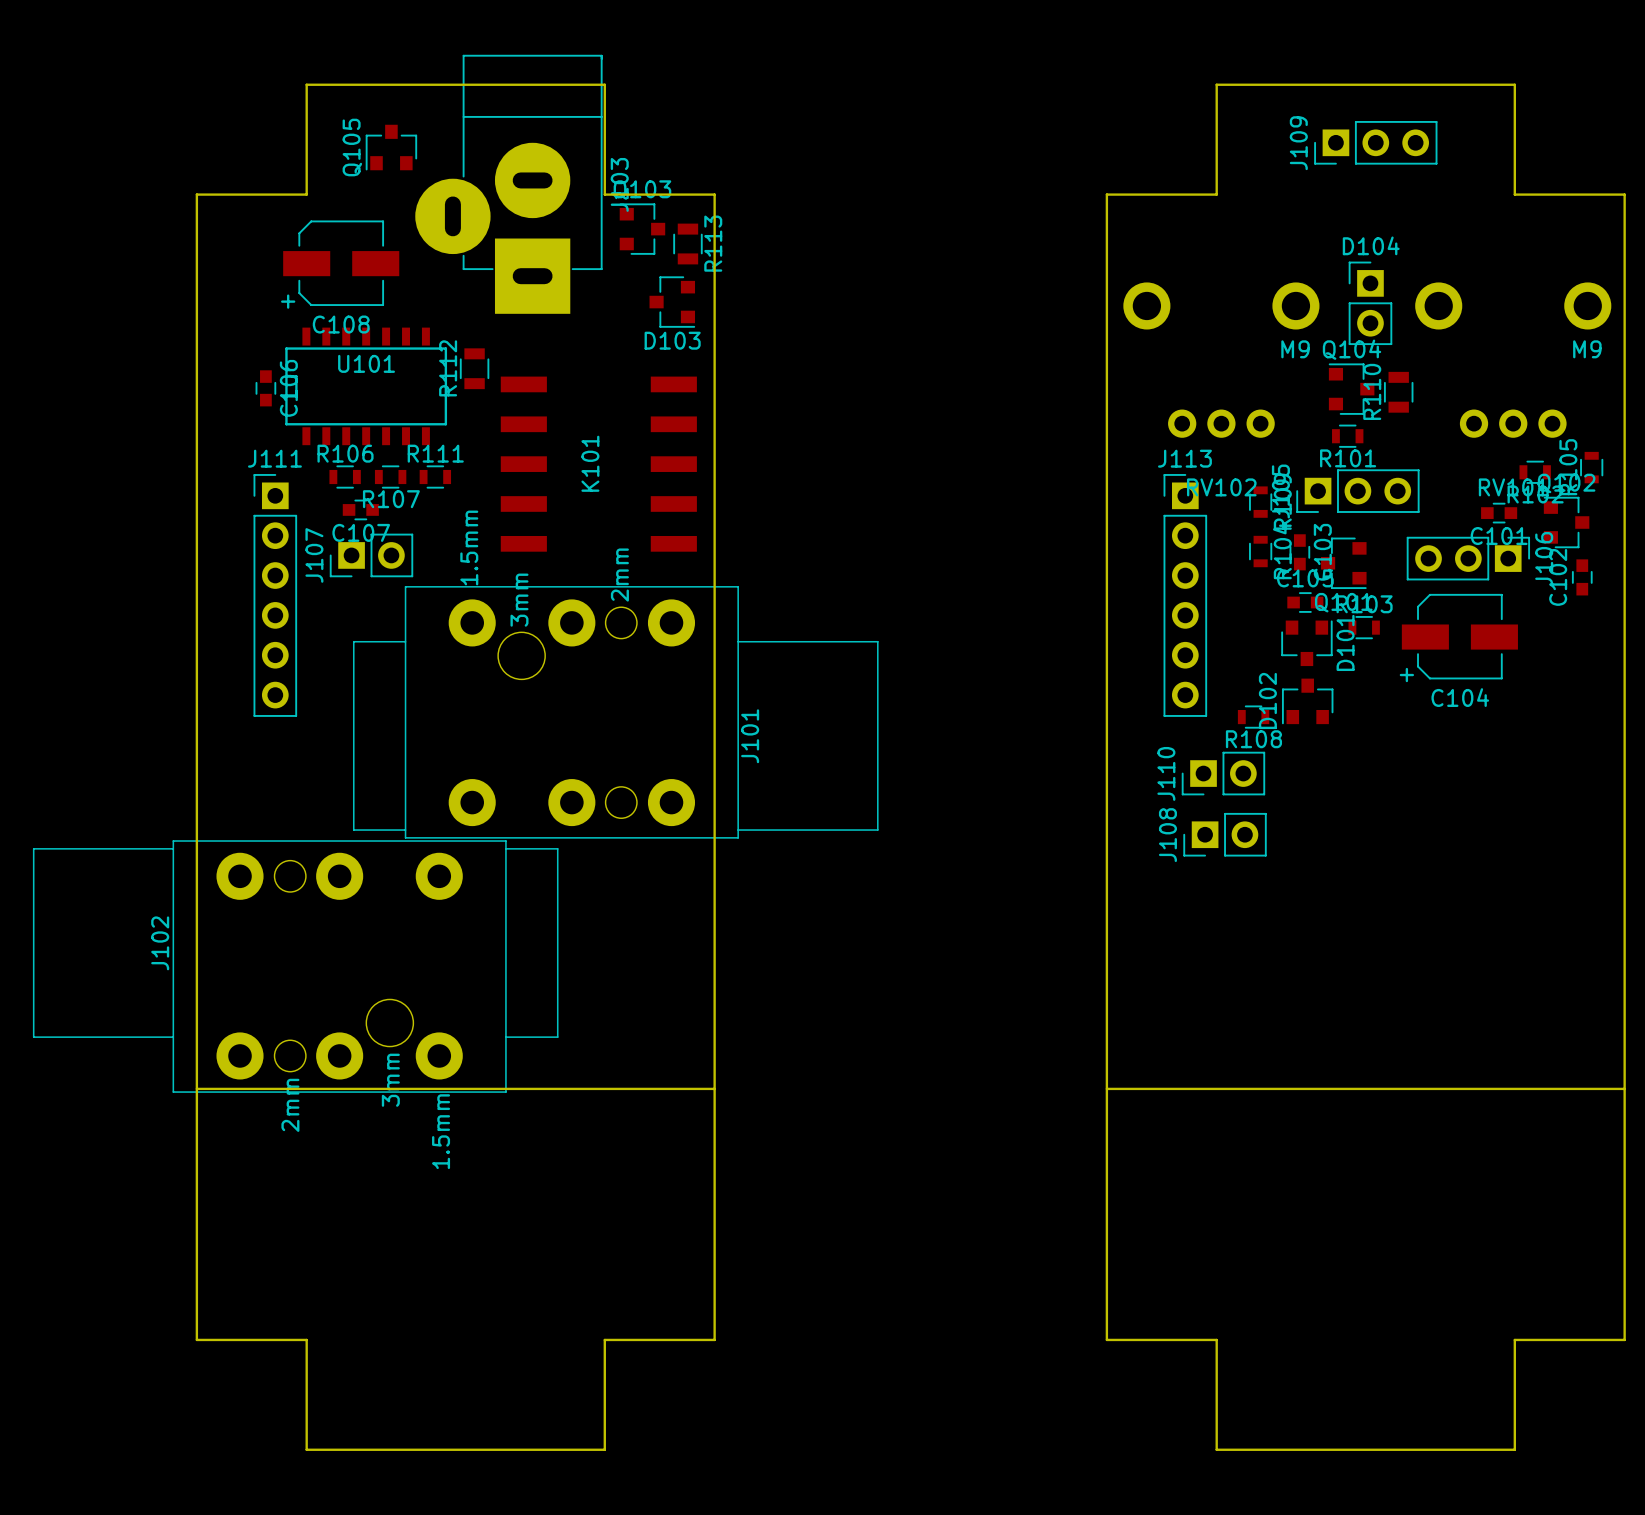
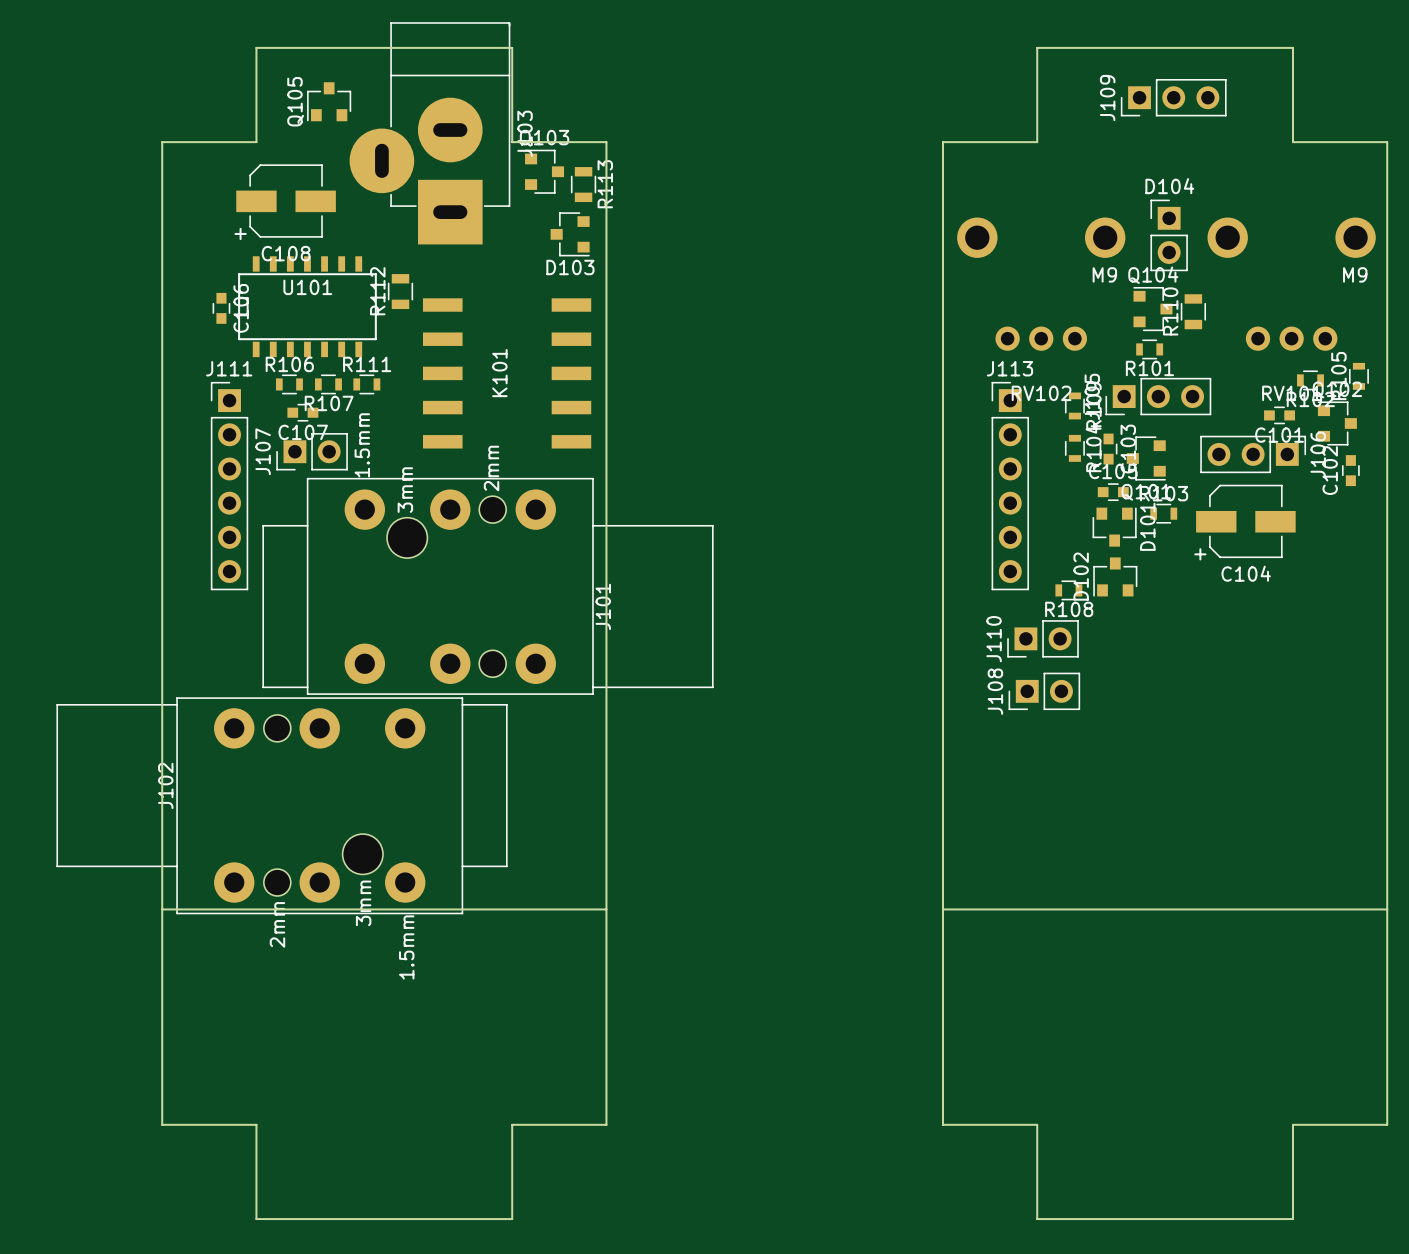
J101 position: (615, 712) -> (487, 586)
J102 position: (295, 966) -> (282, 805)

